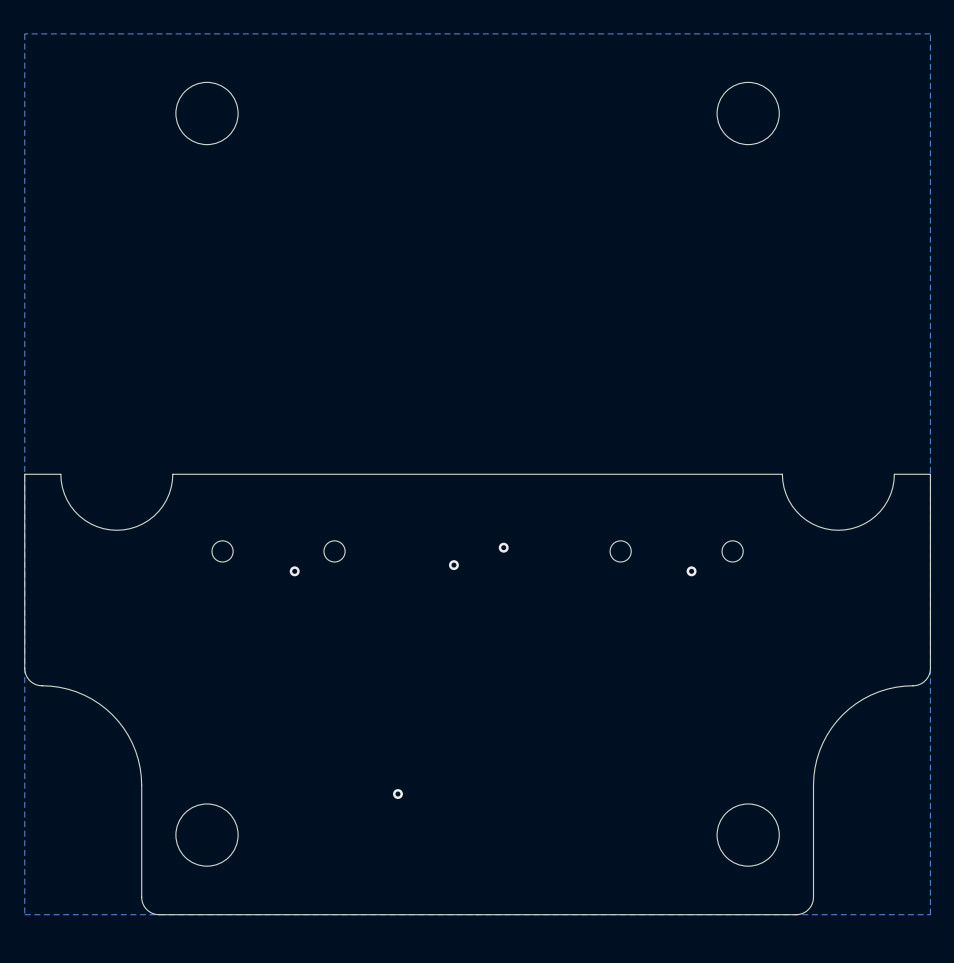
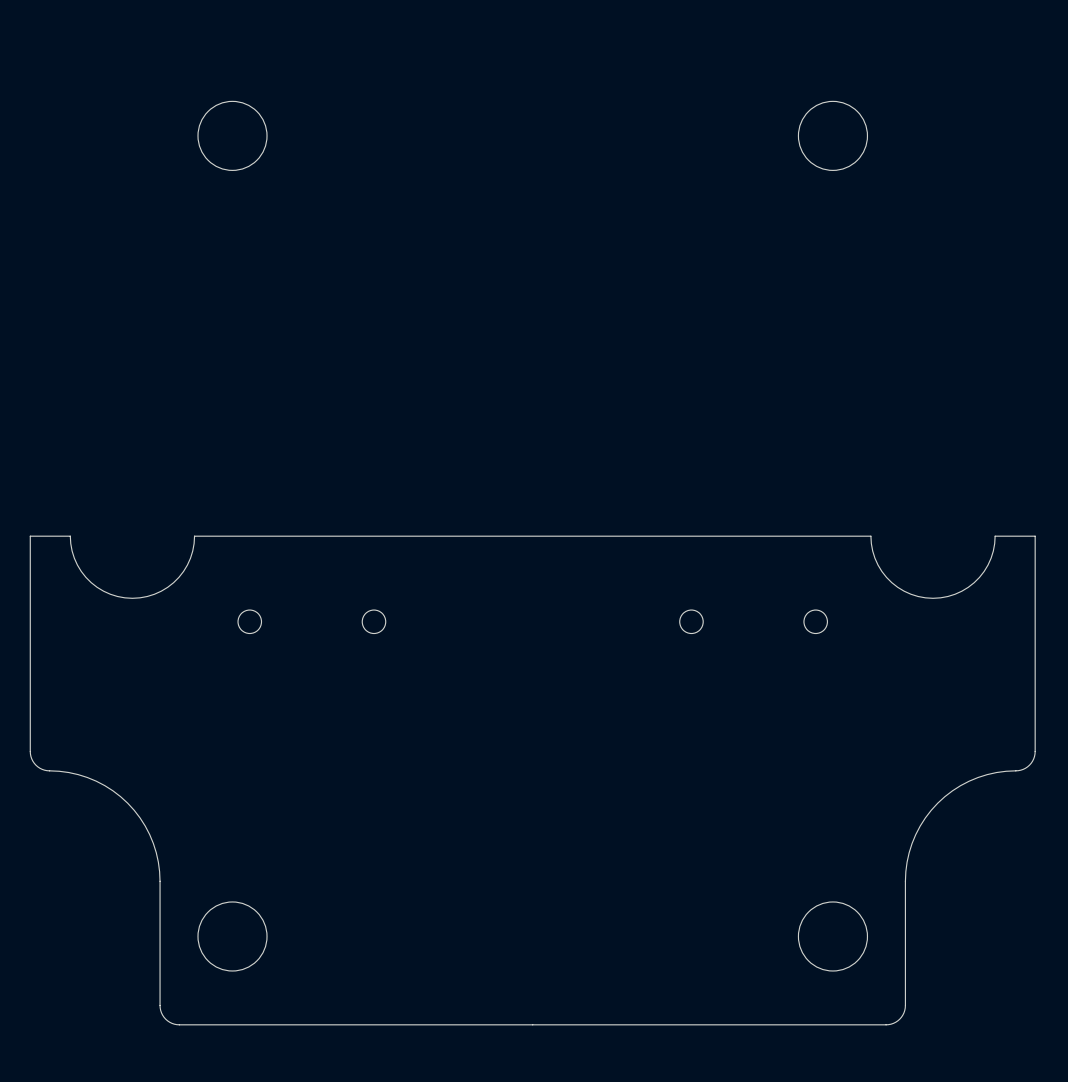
zone outline: (930, 33) (930, 914) (24, 914) (24, 33) (930, 33) -> none
via: (503, 547) -> none
via: (453, 565) -> none
via: (294, 571) -> none
via: (691, 571) -> none
via: (397, 794) -> none

